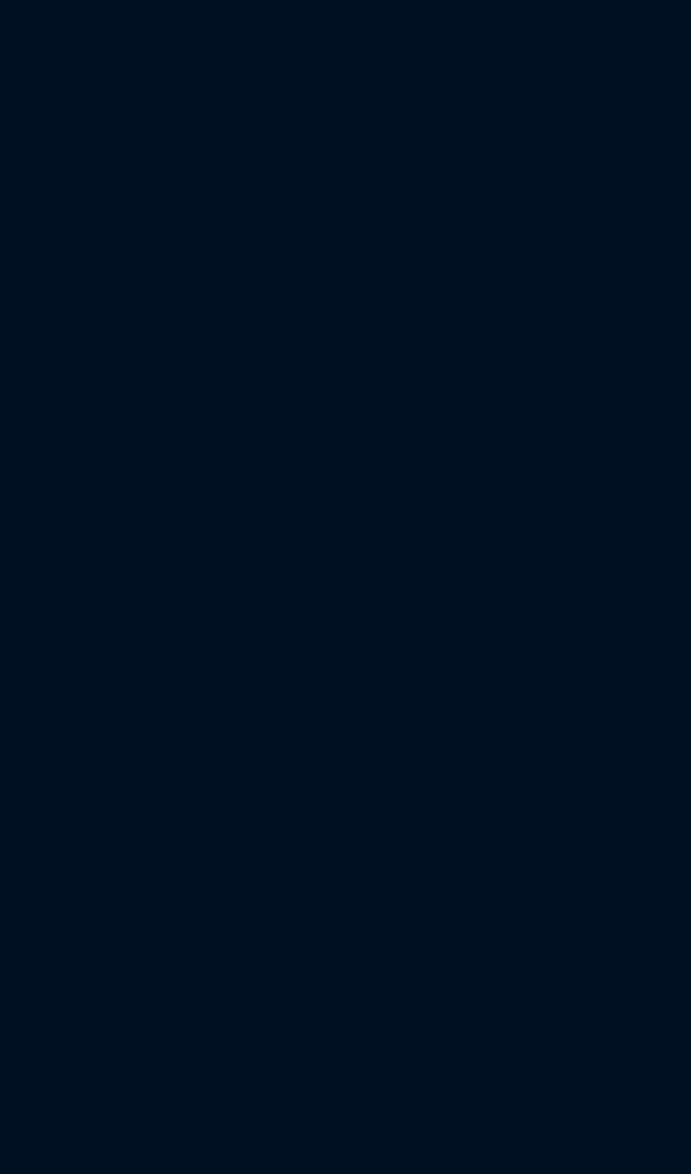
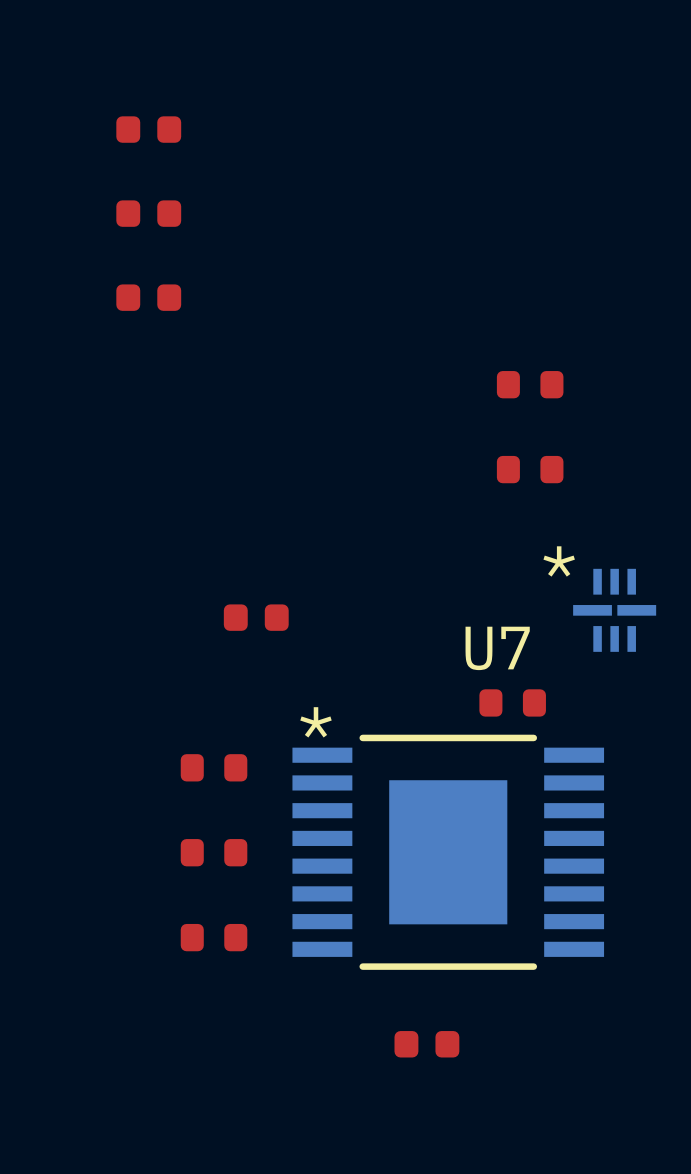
part: none -> (148, 129)
part: none -> (148, 213)
part: none -> (148, 297)
part: none -> (530, 384)
part: none -> (530, 469)
part: none -> (614, 610)
part: none -> (256, 617)
part: none -> (512, 702)
part: none -> (214, 767)
part: none -> (214, 852)
U7: none -> (448, 852)
part: none -> (214, 937)
part: none -> (426, 1044)

